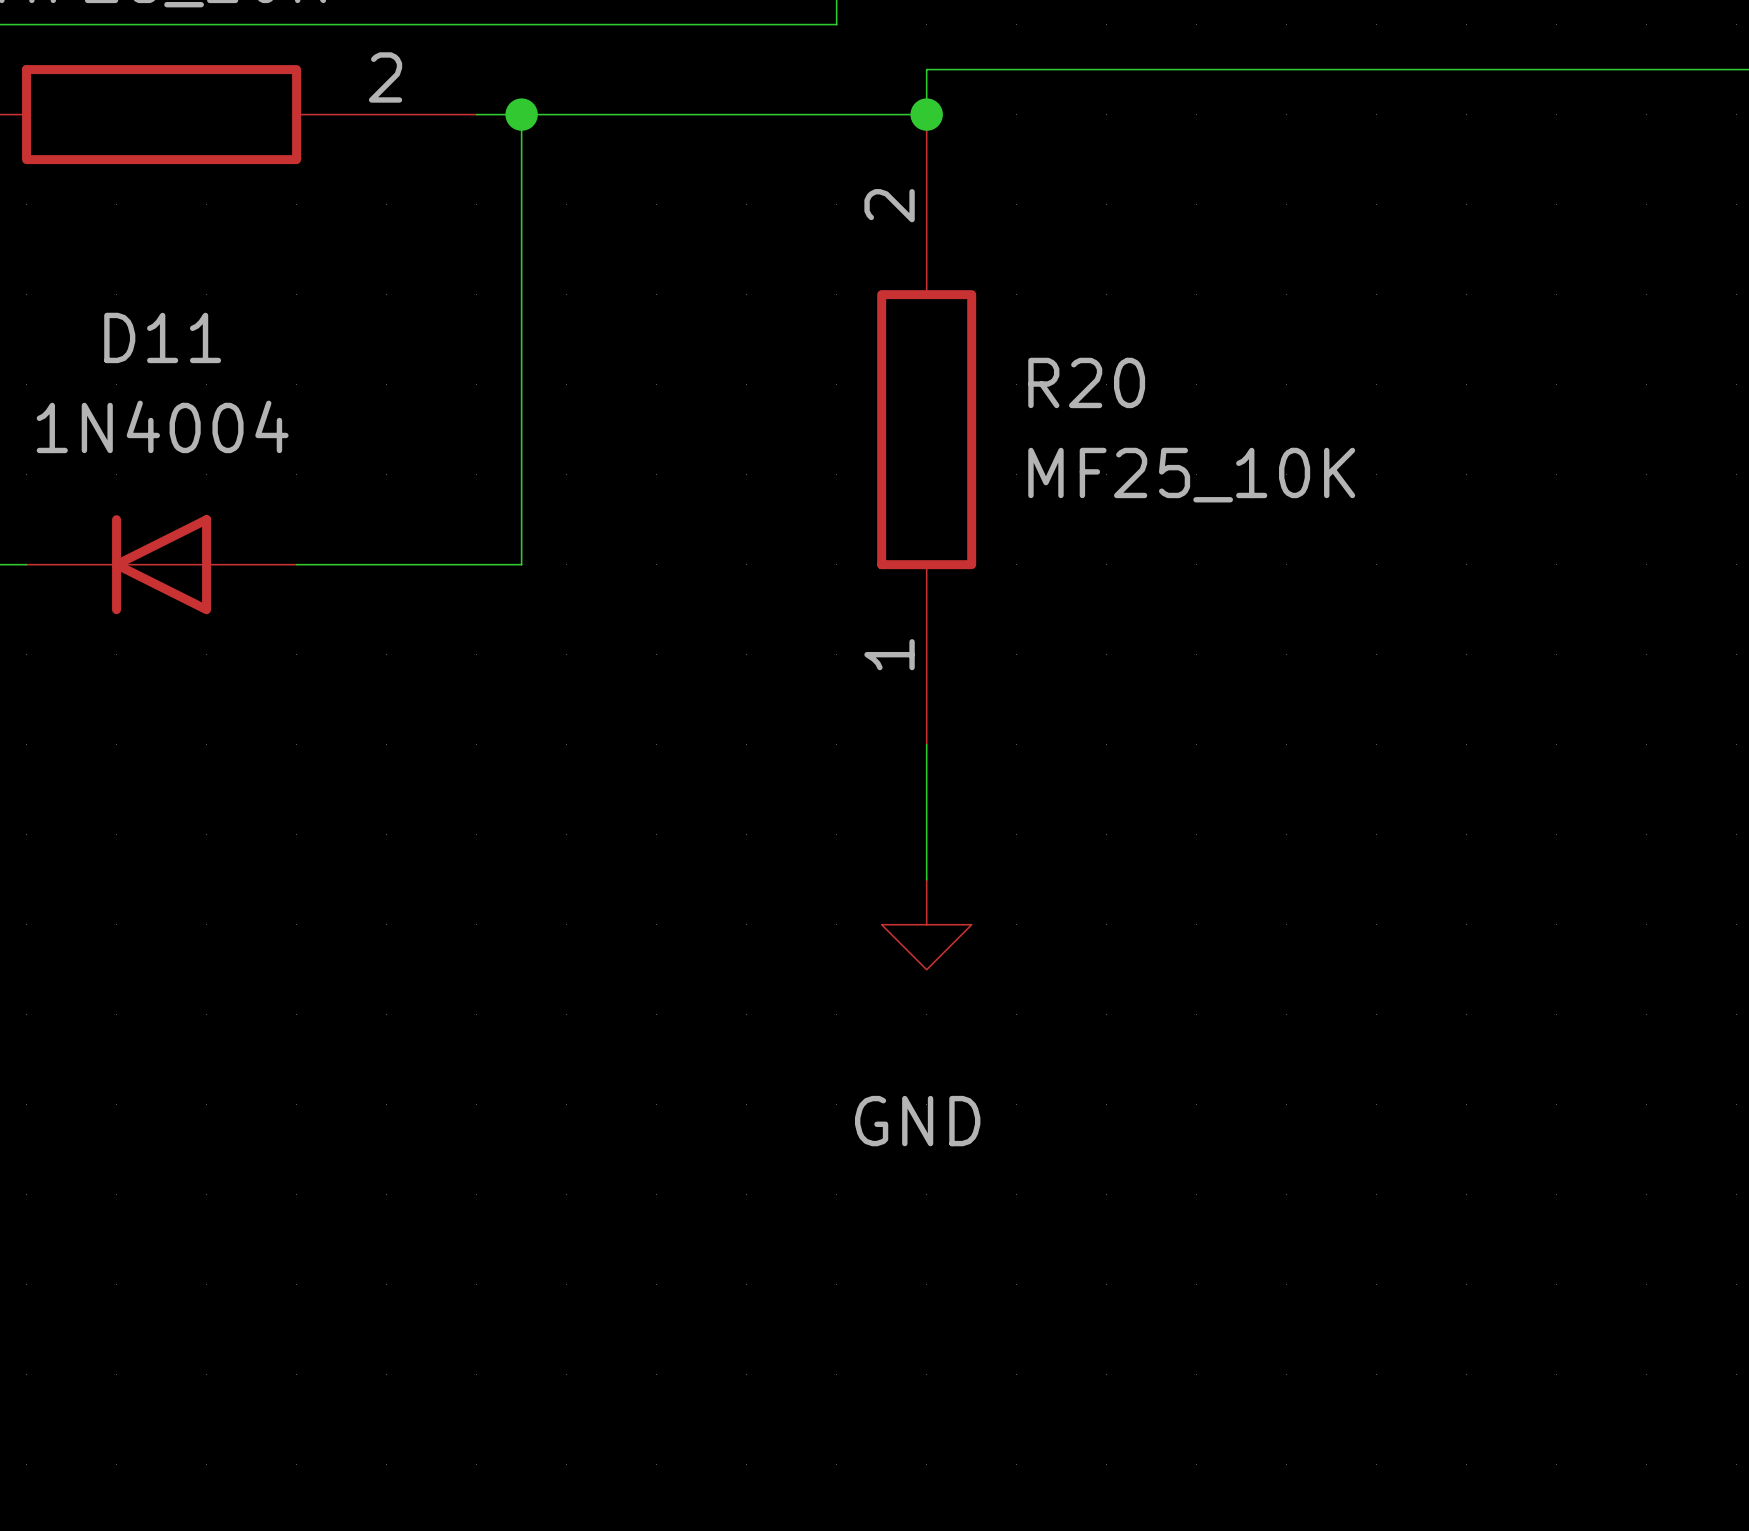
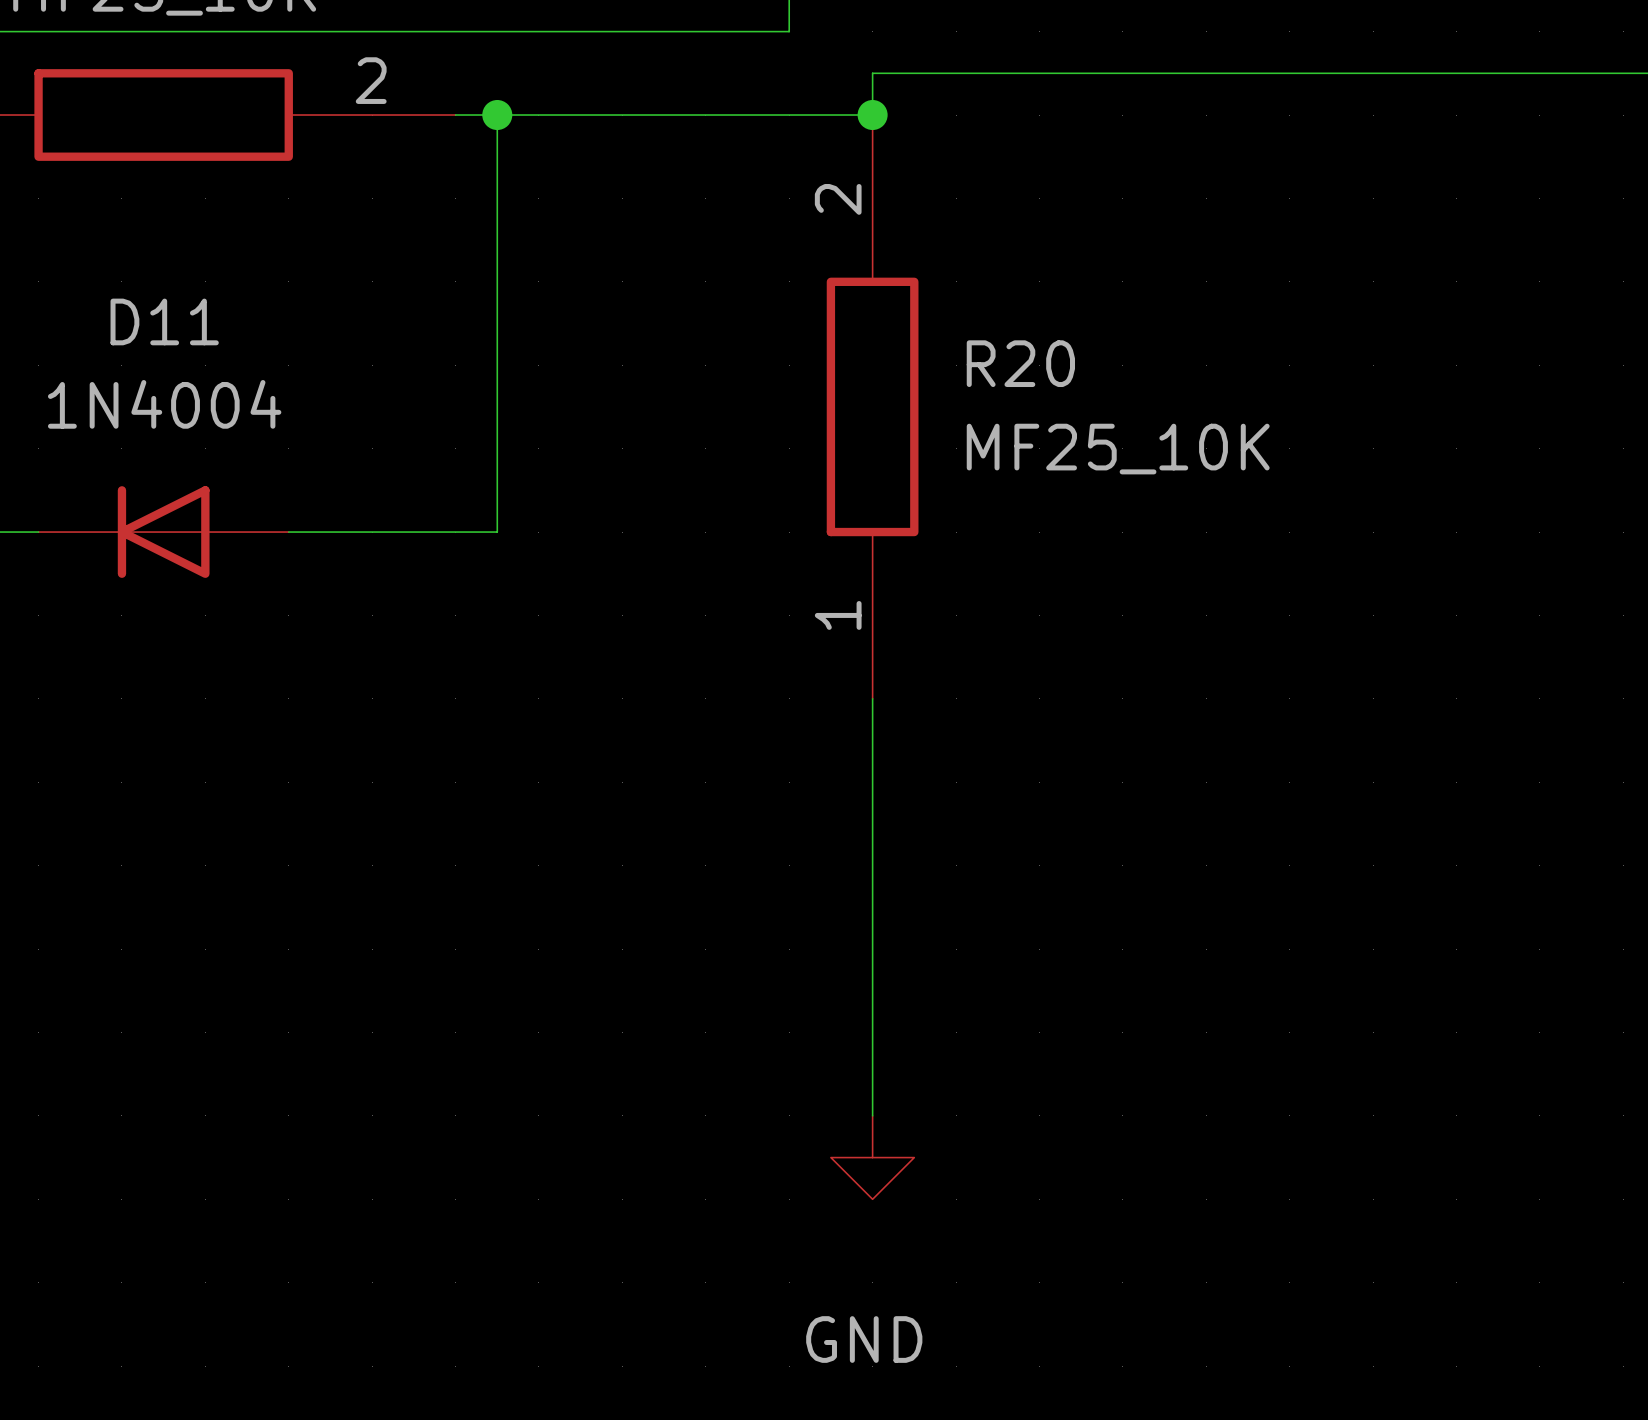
wire: none -> (872, 823) (872, 1115)
power symbol position: GND (926, 924) -> GND (872, 1157)

